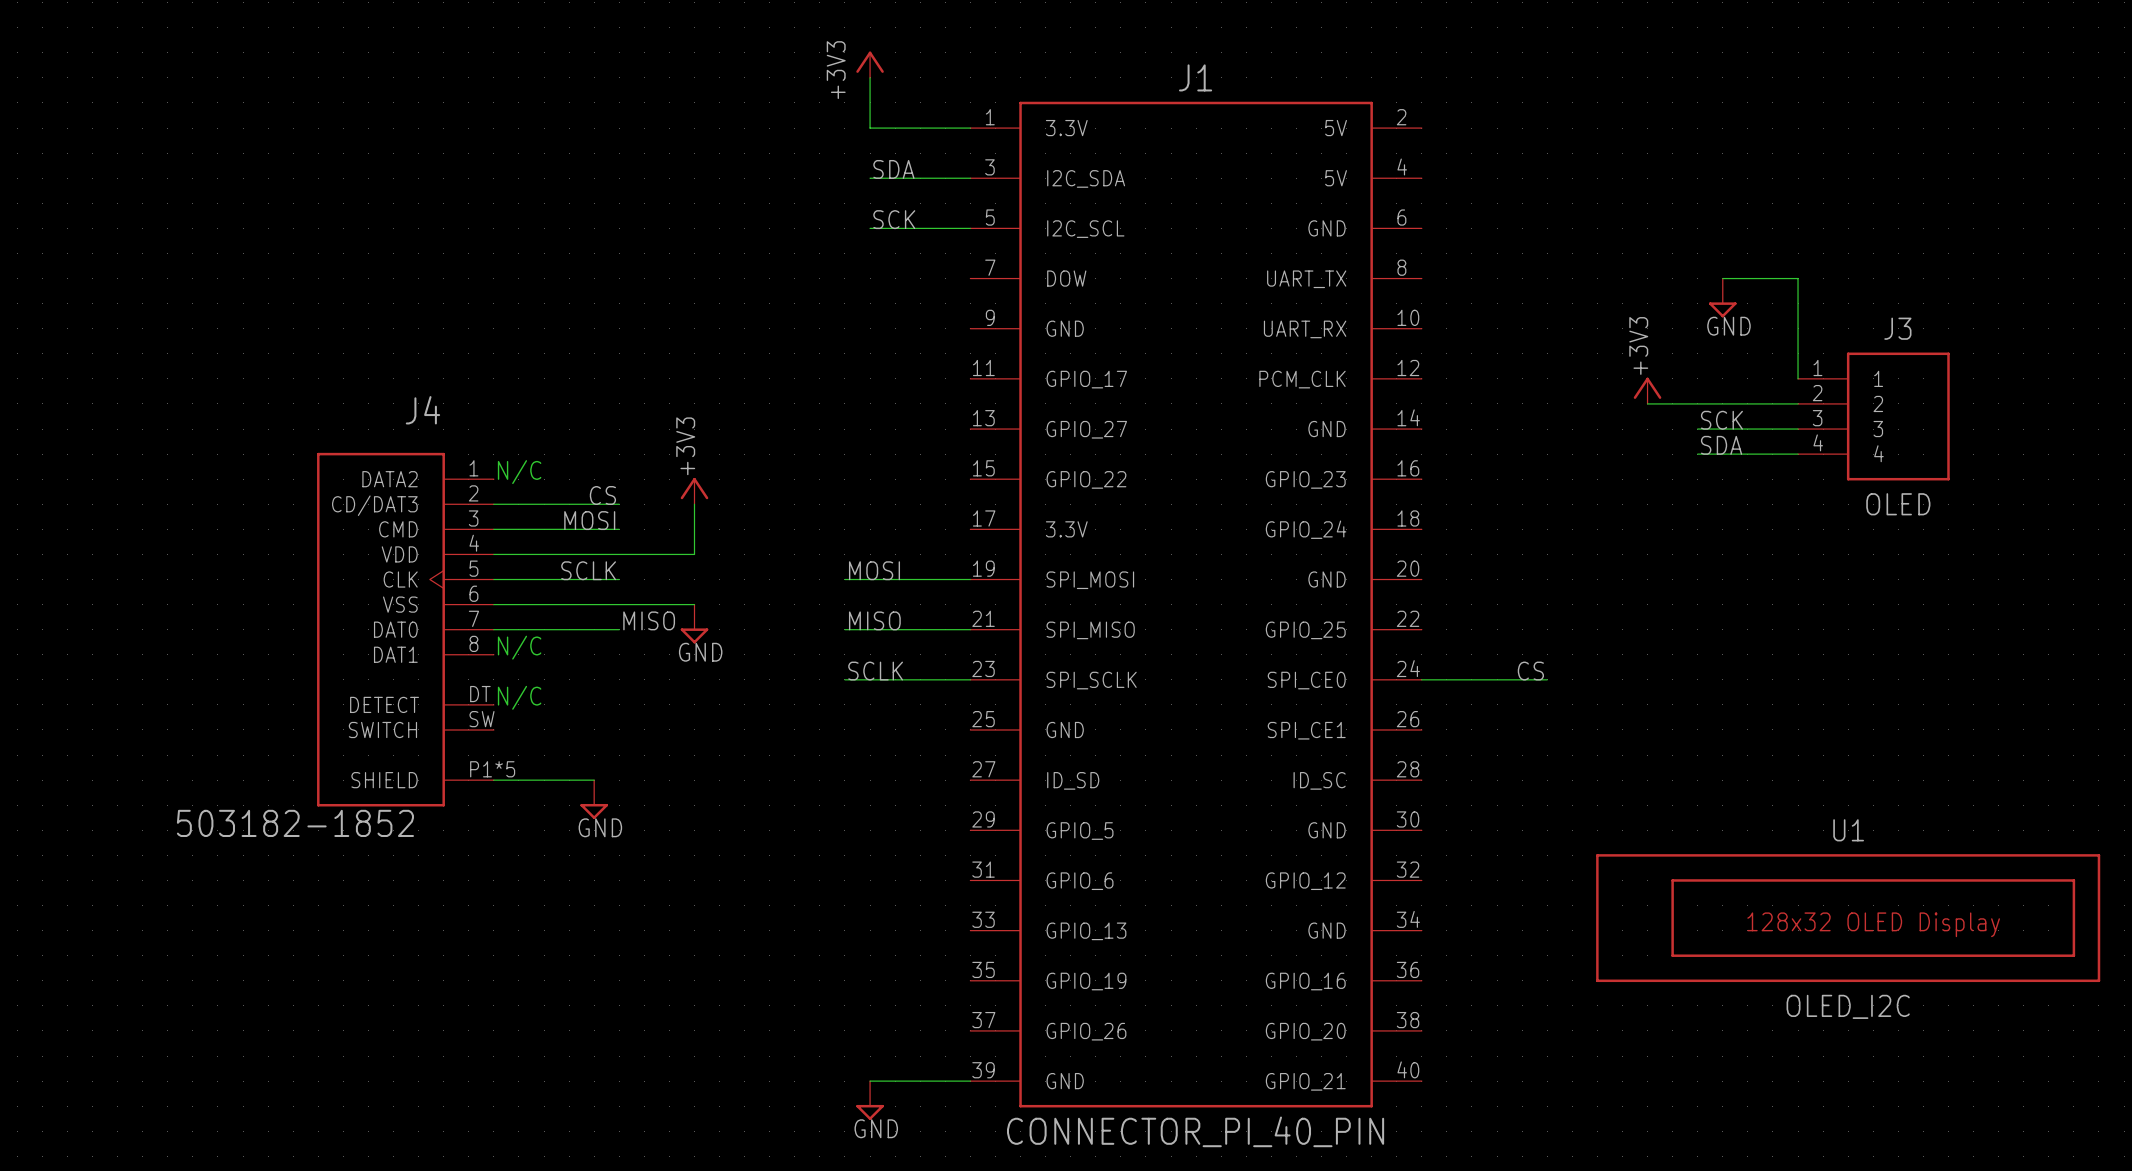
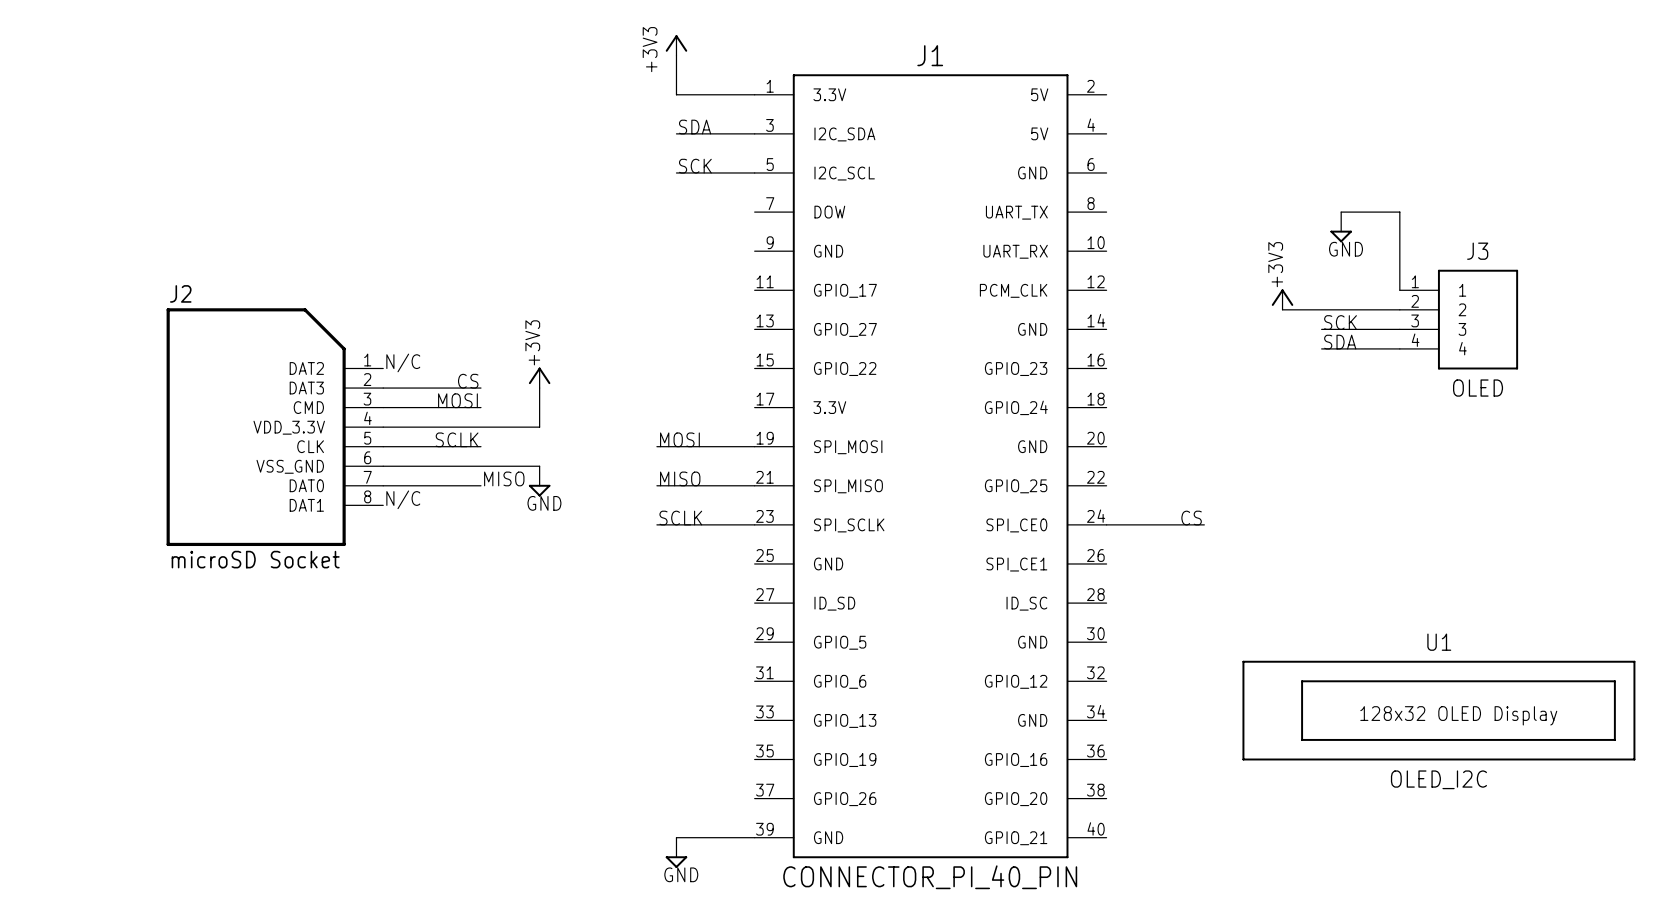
J2: none -> microSD Socket (274, 427)
J4: 503182-1852 (405, 629) -> none
text: N/C (519, 697) -> none
wire: (493, 780) (594, 780) -> none
power symbol: GND (594, 799) -> none

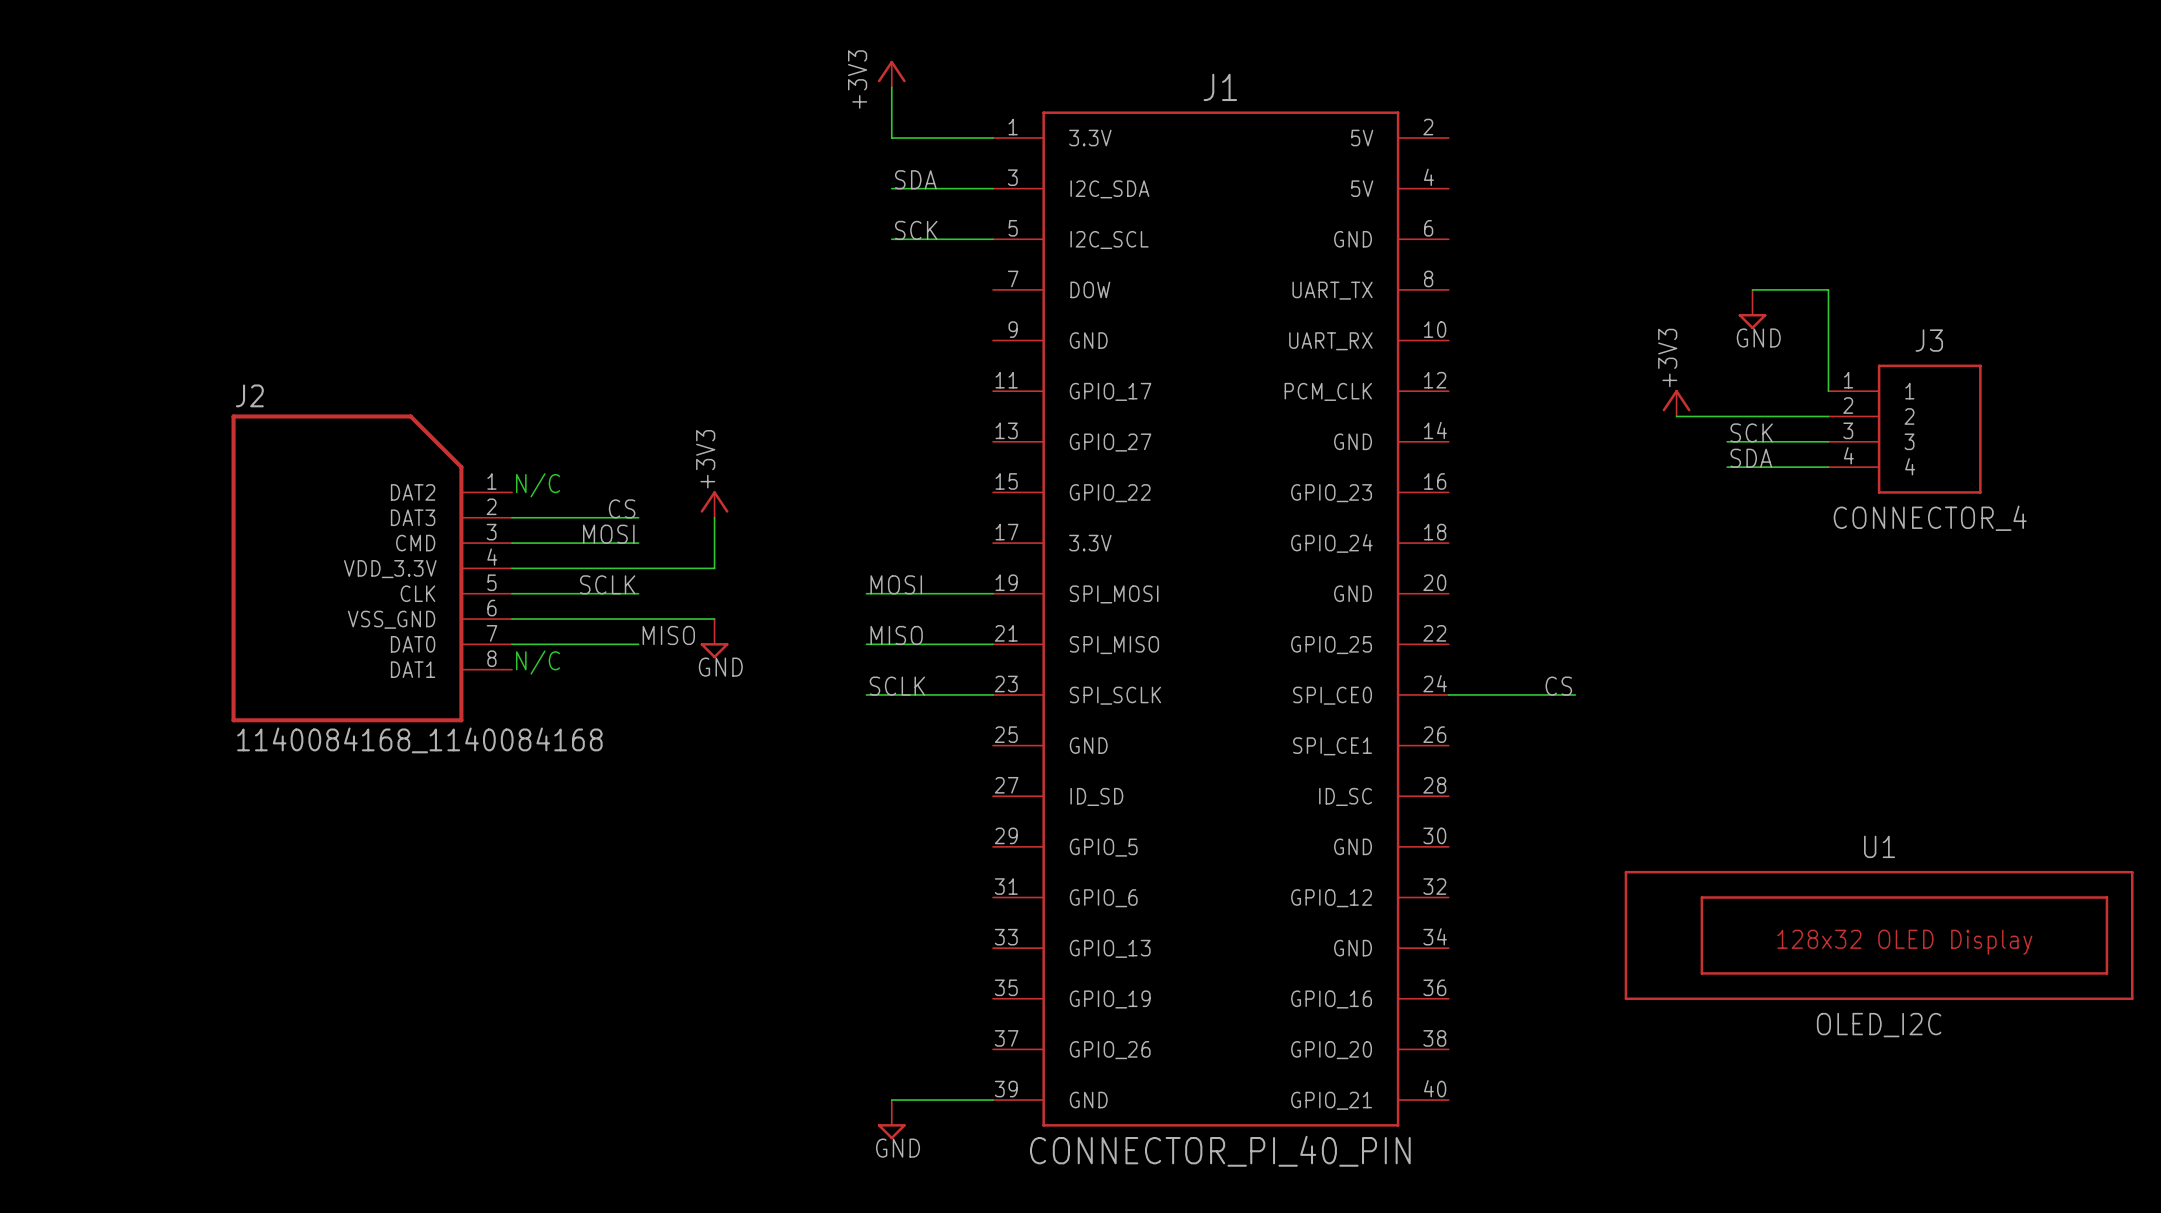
J3 value: OLED (1478, 388) -> CONNECTOR_4 (1930, 518)
J2 value: microSD Socket (255, 559) -> 1140084168_1140084168 (419, 740)

